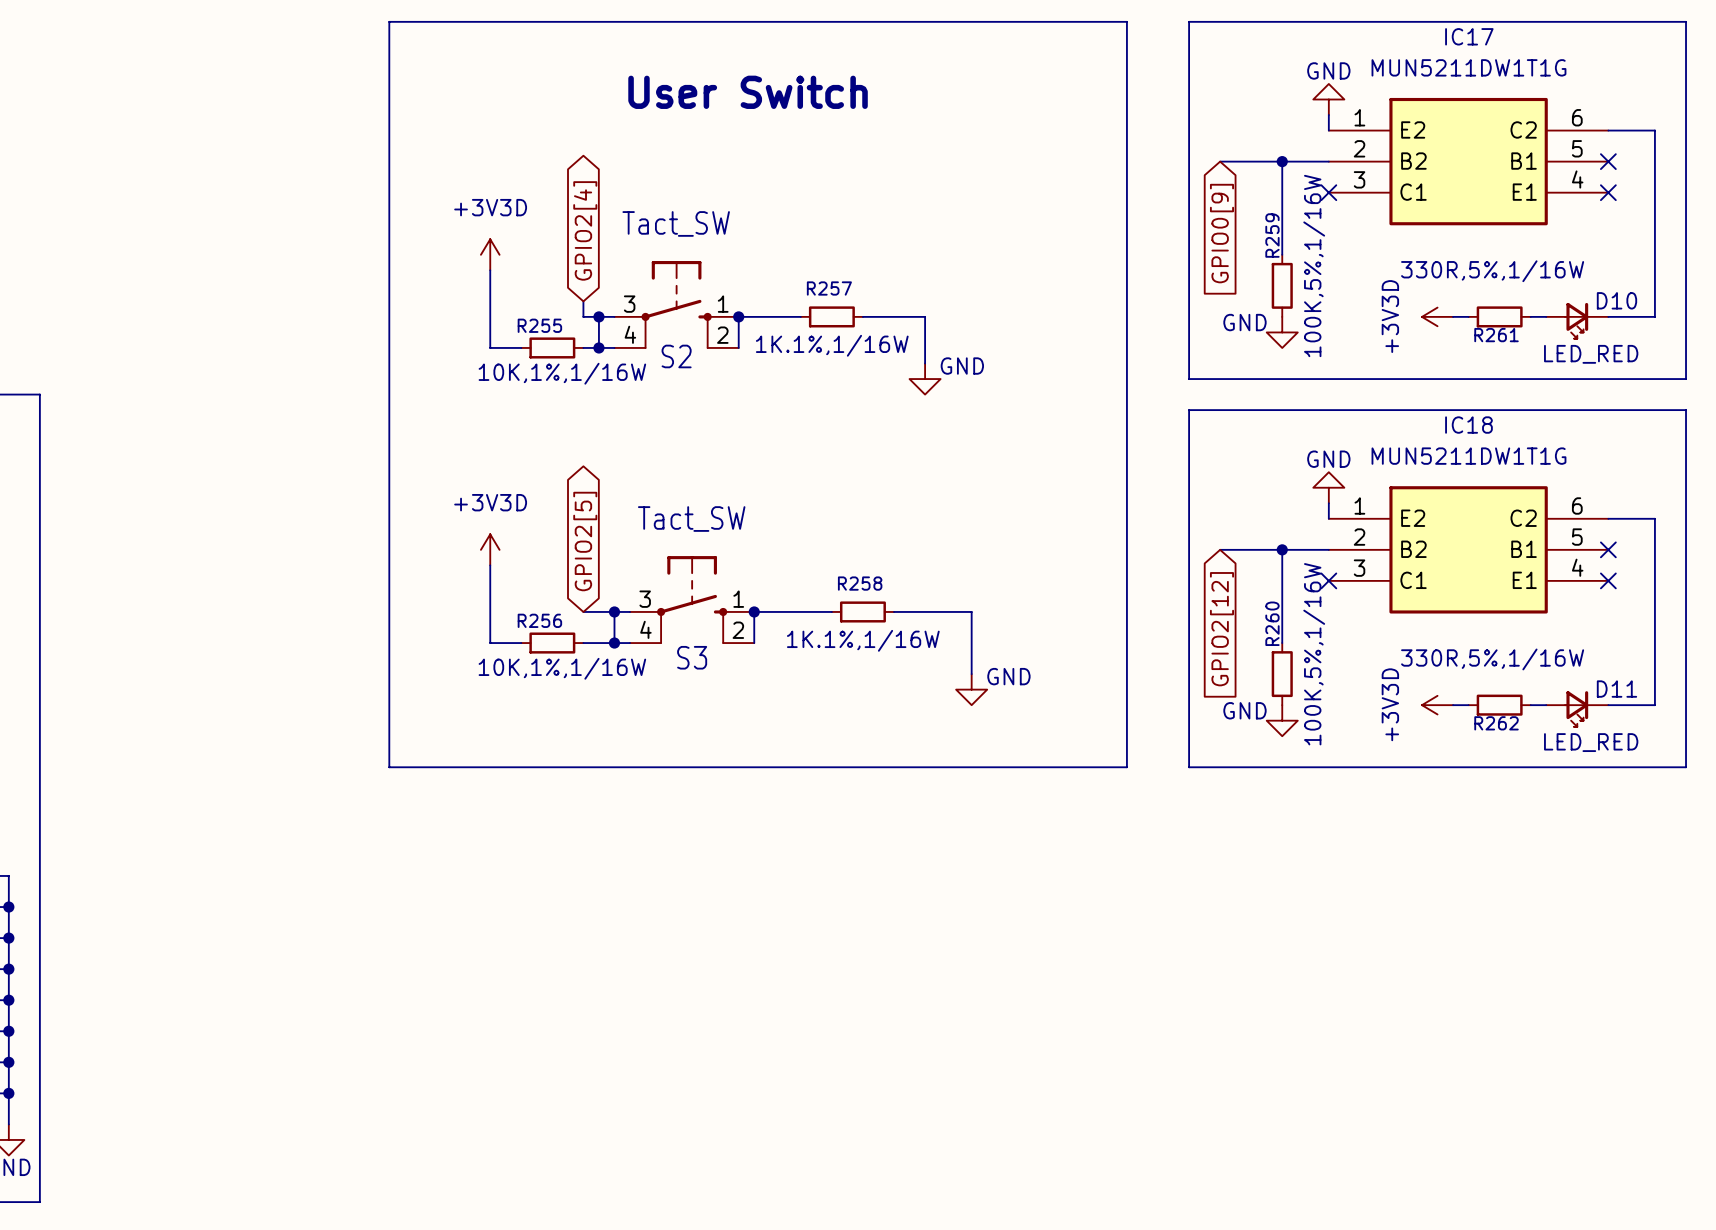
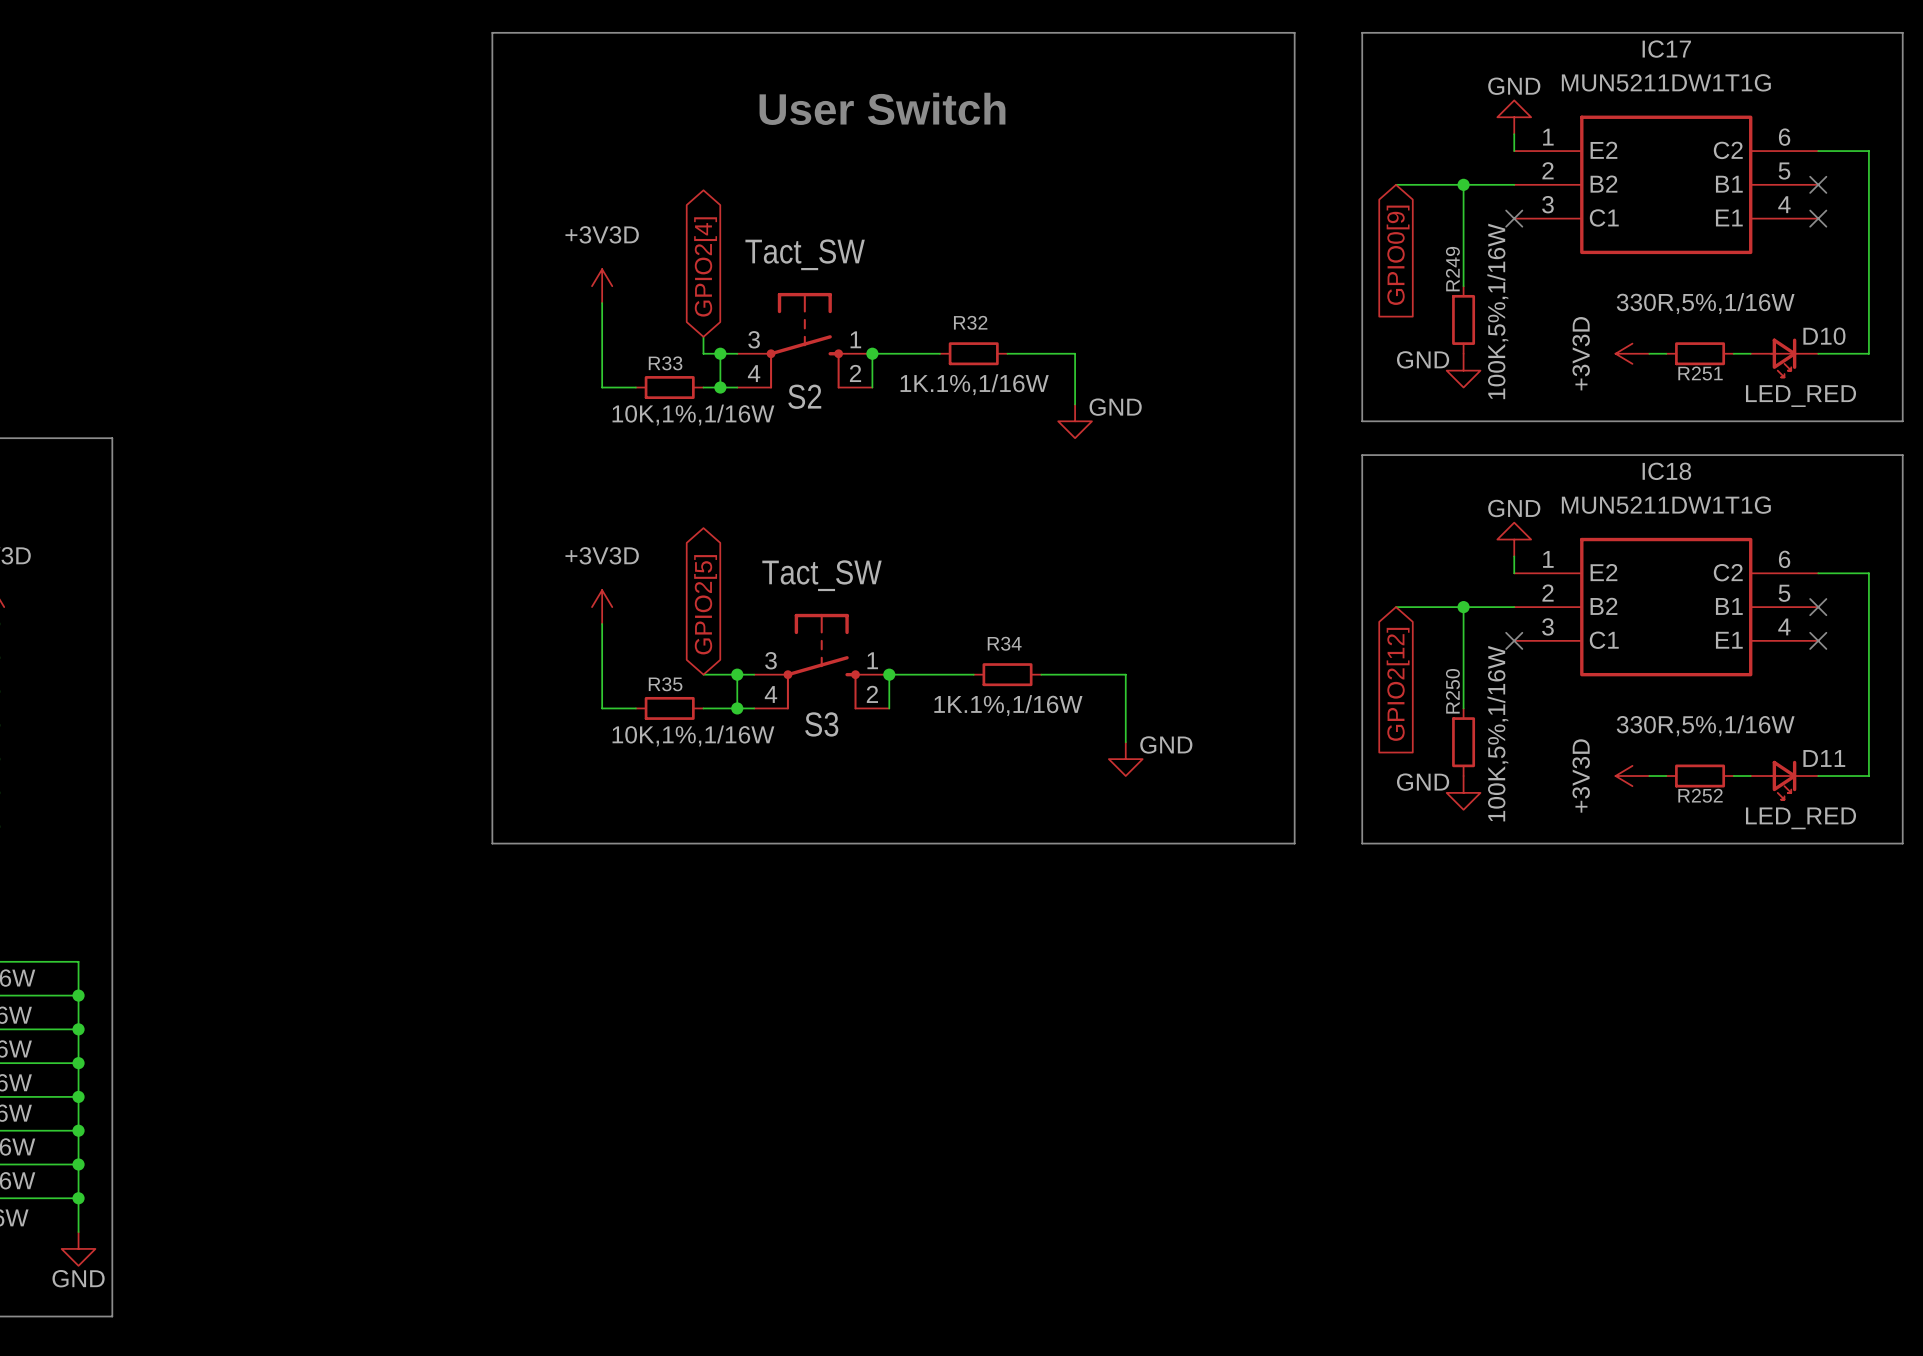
R259 name: R259 (1272, 235) -> R249 (1452, 269)
R257 name: R257 (829, 288) -> R32 (970, 322)
R255 name: R255 (539, 325) -> R33 (665, 363)
R261 name: R261 (1496, 335) -> R251 (1700, 373)
R258 name: R258 (860, 583) -> R34 (1004, 643)
R256 name: R256 (539, 620) -> R35 (665, 684)
R260 name: R260 (1272, 623) -> R250 (1452, 691)
R262 name: R262 (1496, 723) -> R252 (1700, 795)

